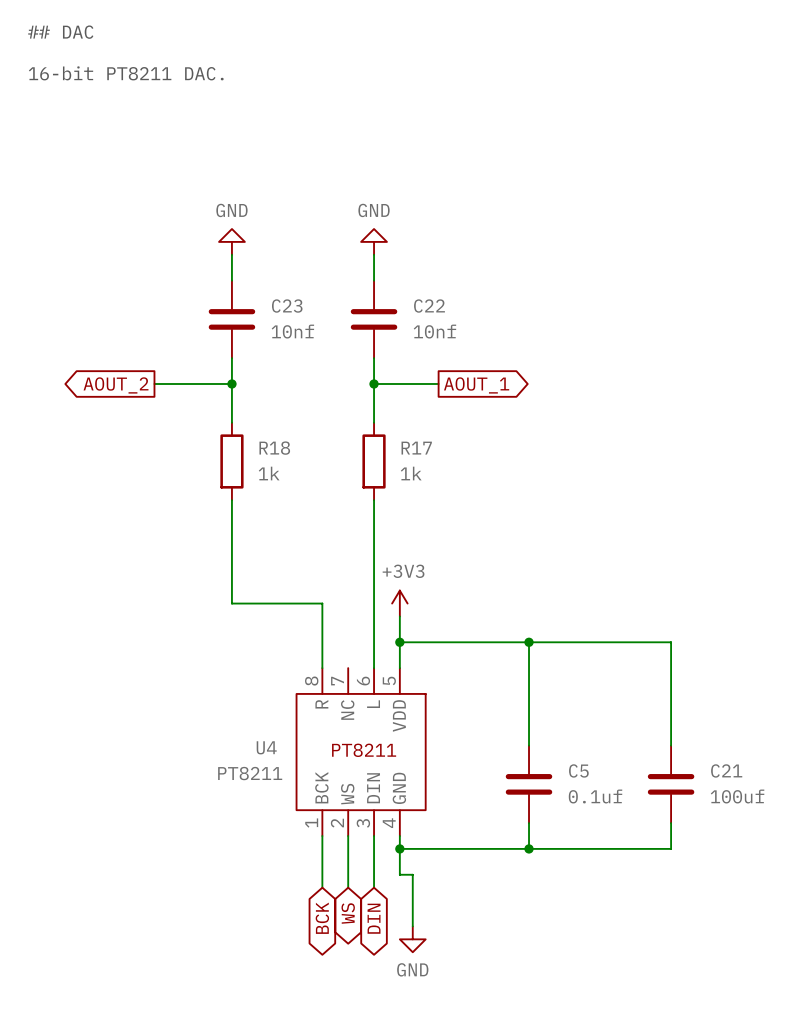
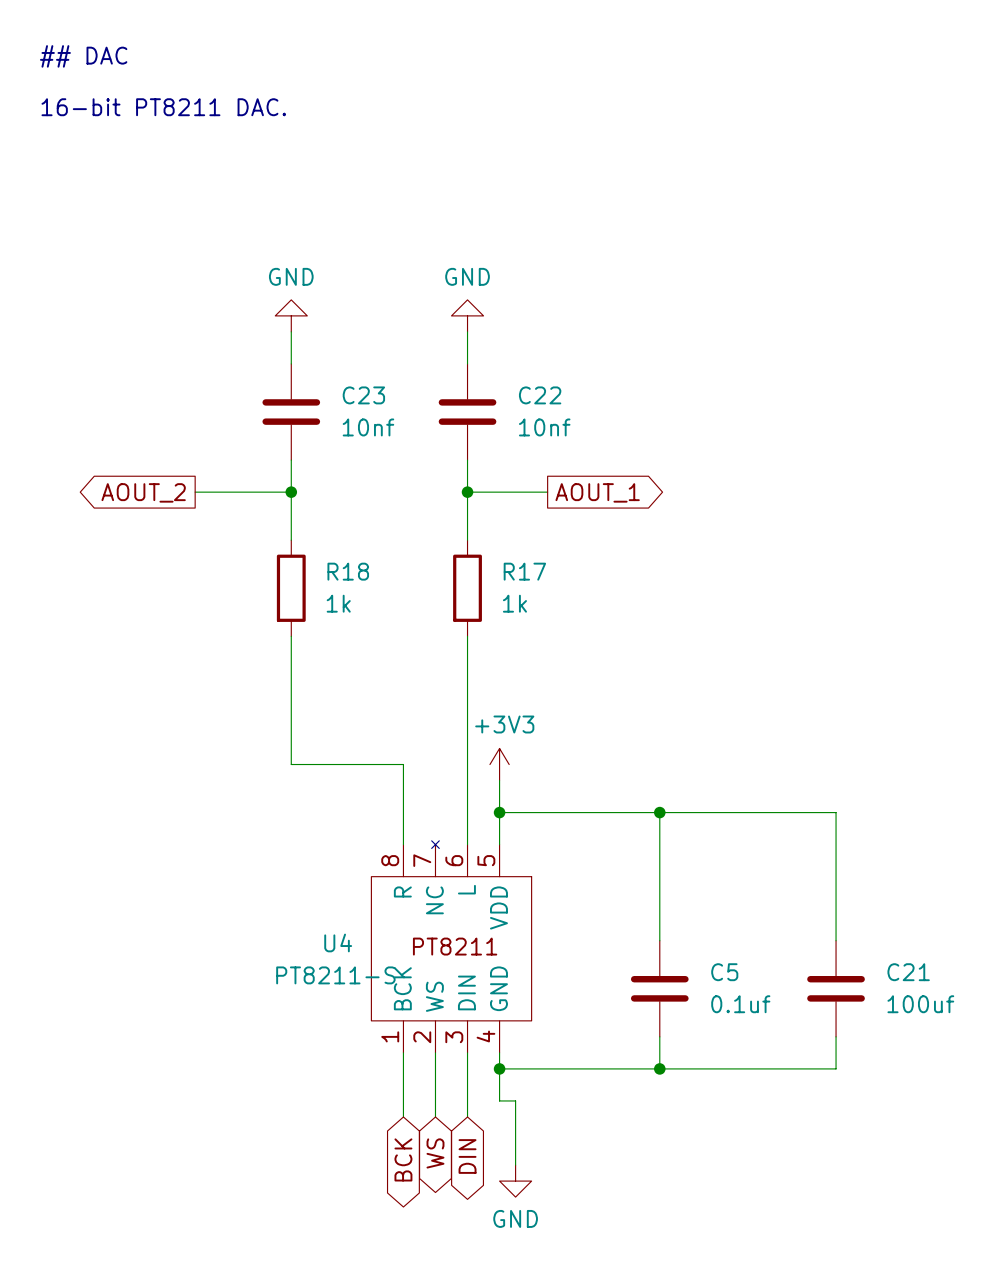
U4 symbol: [296, 668, 426, 837] -> [371, 840, 532, 1053]
U4 value: PT8211 (250, 773) -> PT8211-S (335, 975)

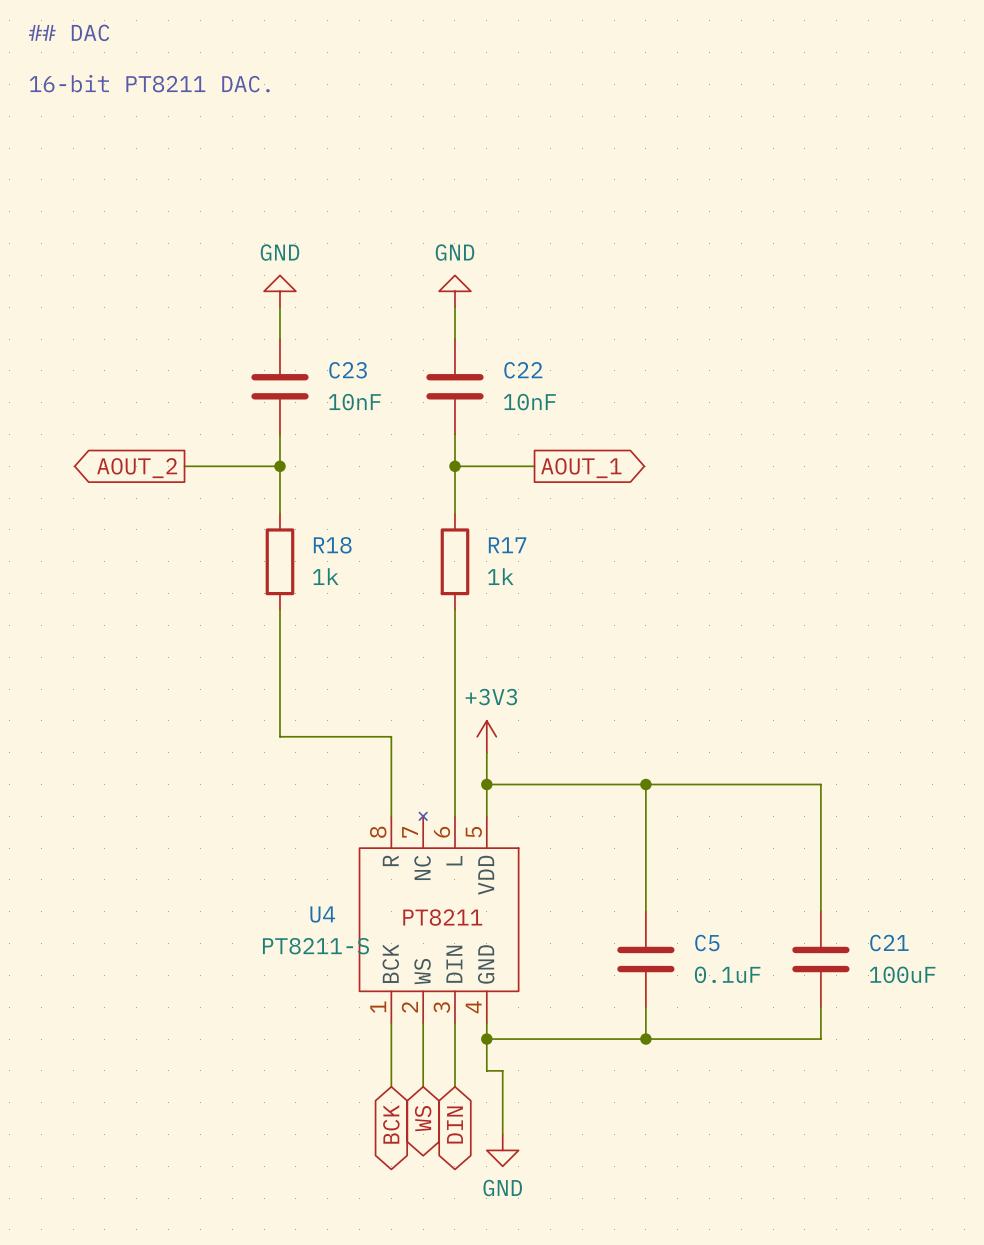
C23 value: 10nf (368, 427) -> 10nF (354, 402)
C22 value: 10nf (544, 427) -> 10nF (529, 402)
C5 value: 0.1uf (740, 1004) -> 0.1uF (727, 974)
C21 value: 100uf (920, 1004) -> 100uF (902, 974)

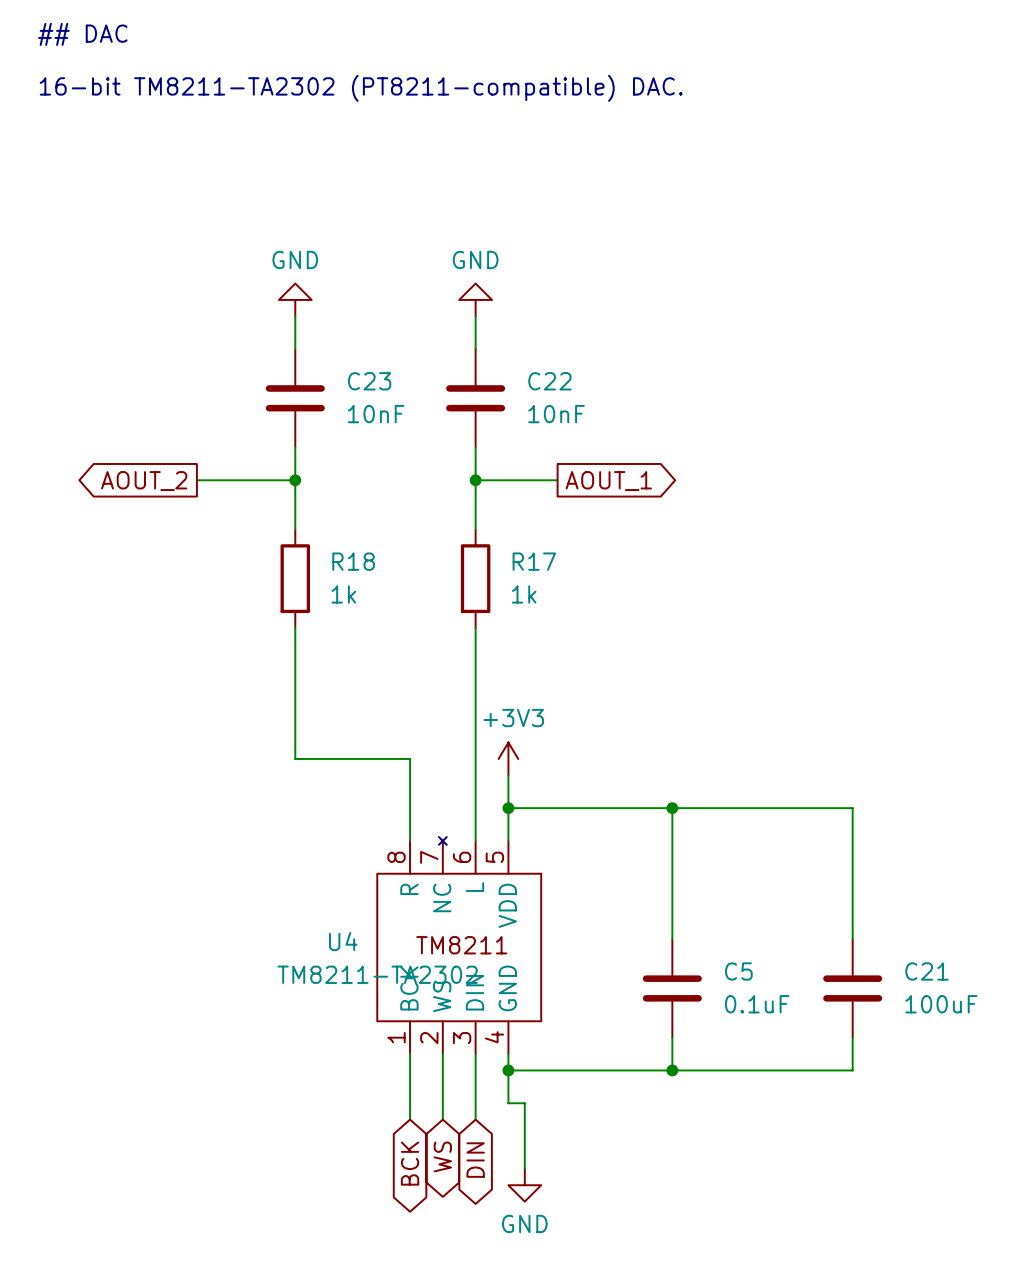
text: 16-bit PT8211 DAC. (149, 83) -> 16-bit TM8211-TA2302 (PT8211-compatible) DAC. (361, 88)
U4 text: PT8211 (442, 917) -> TM8211 (461, 945)
U4 value: PT8211-S (315, 946) -> TM8211-TA2302 (377, 974)

